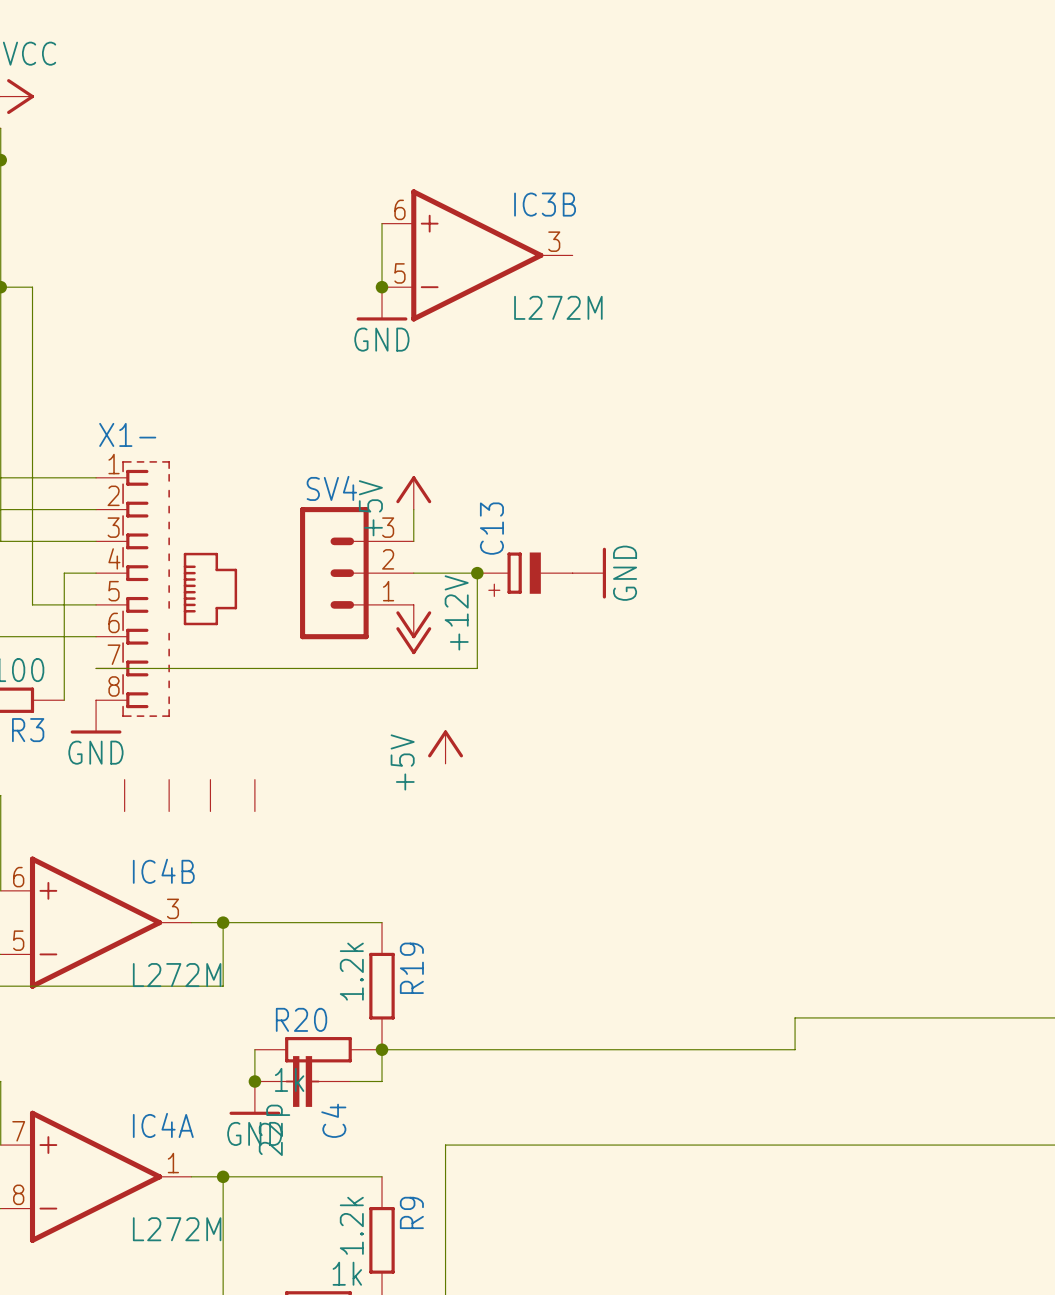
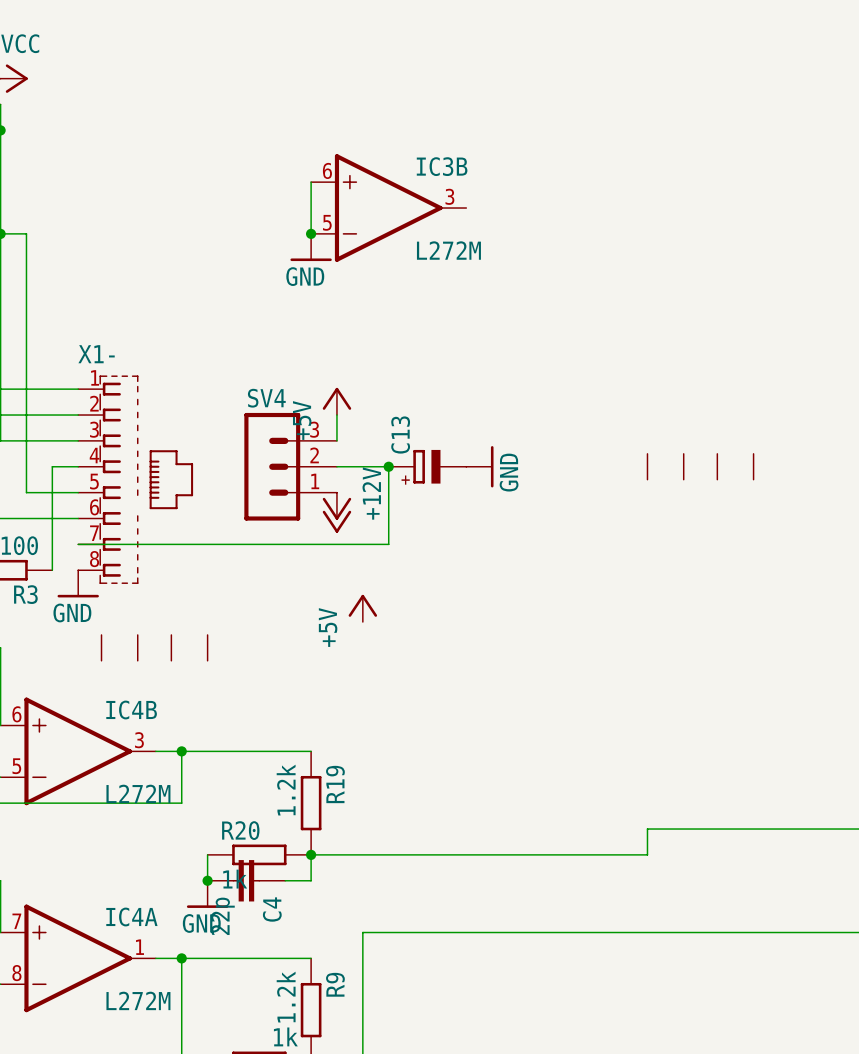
part: none -> (647, 466)
part: none -> (683, 466)
part: none -> (717, 466)
part: none -> (753, 466)

